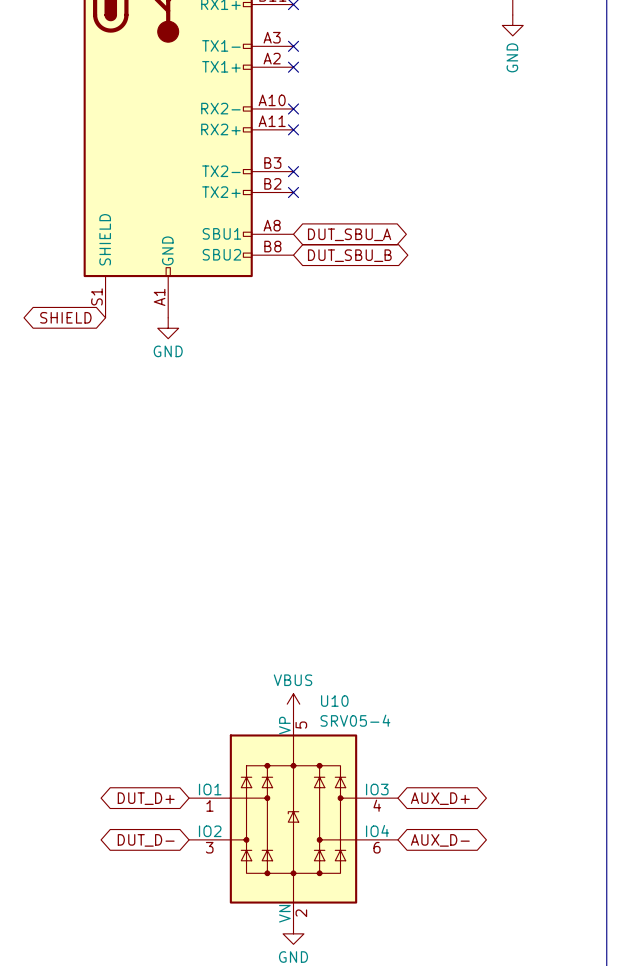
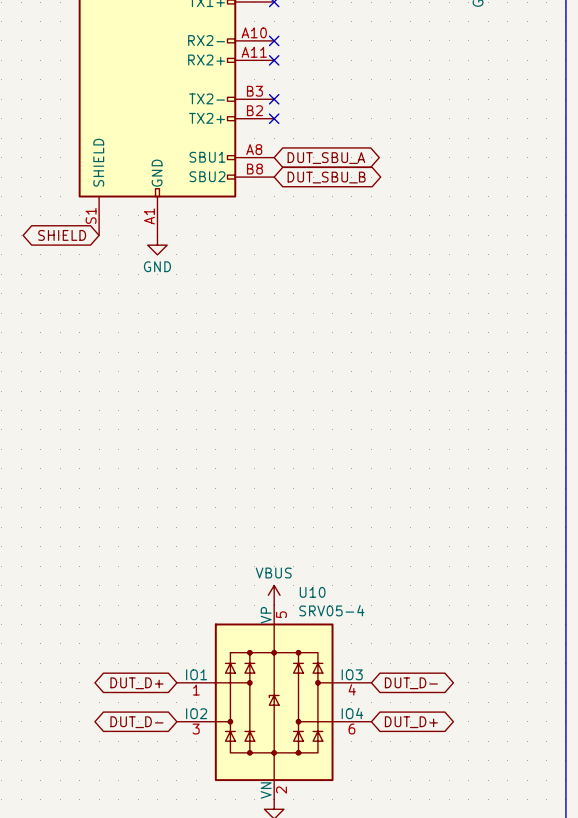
global label: AUX_D+ (440, 798) -> DUT_D- (411, 683)
global label: AUX_D- (440, 840) -> DUT_D+ (411, 722)

